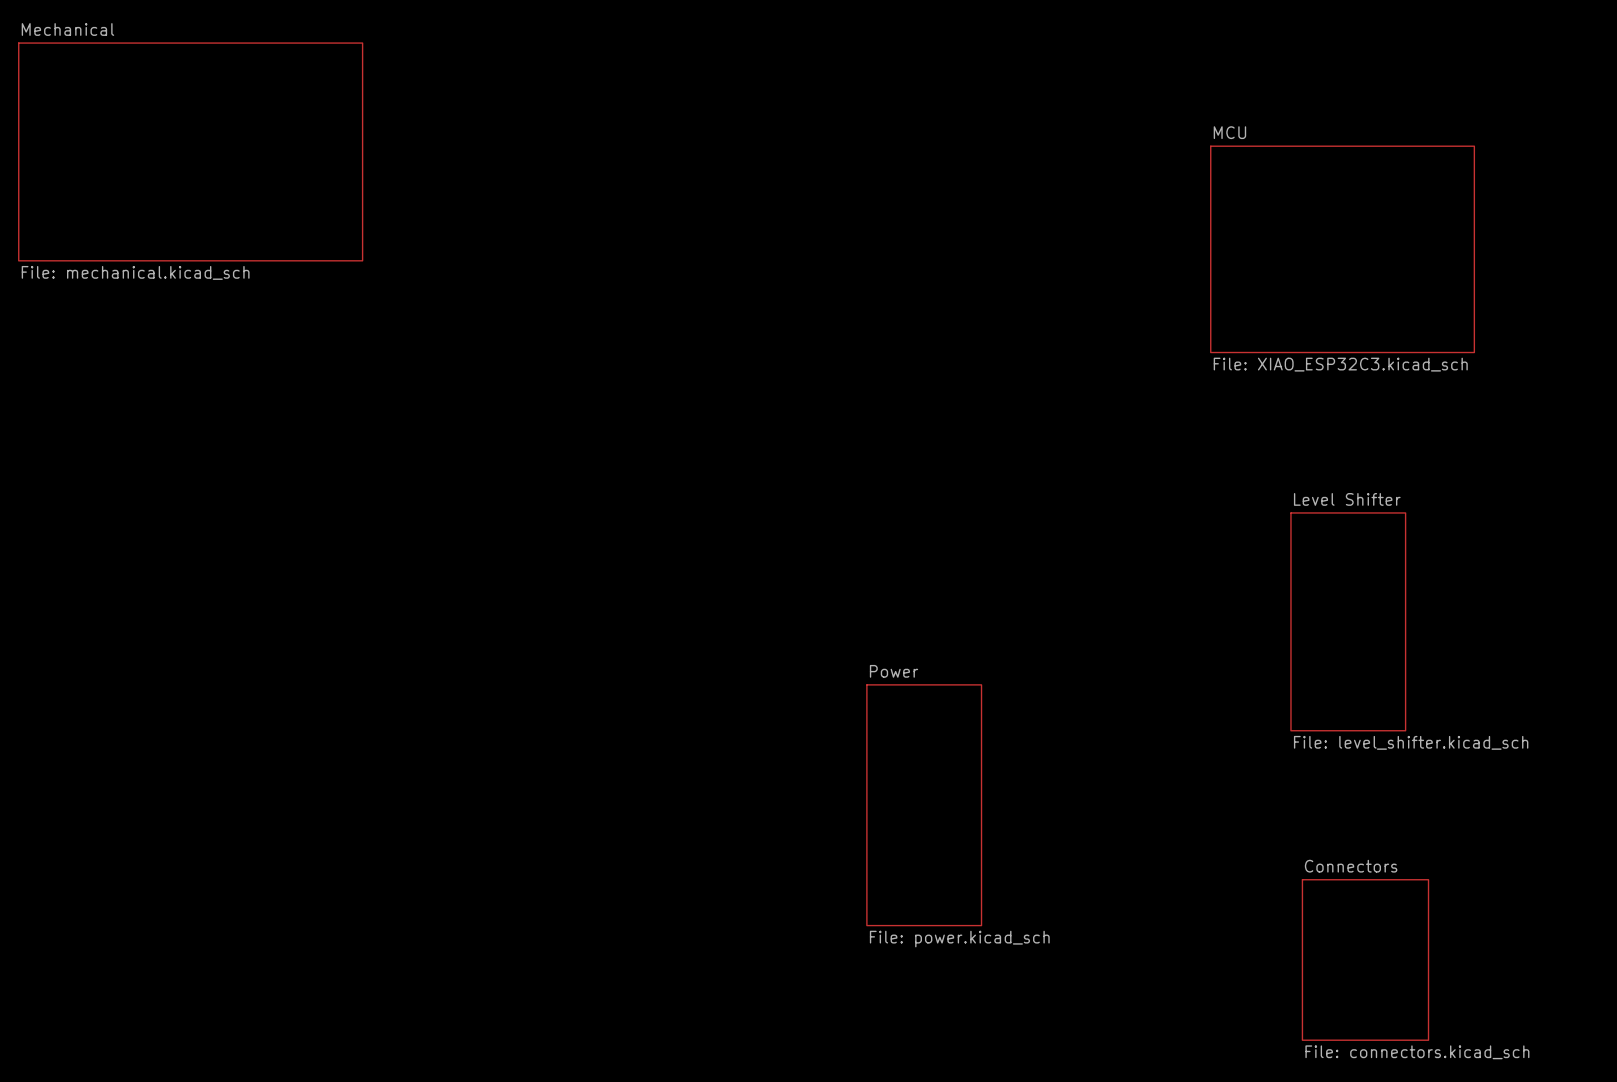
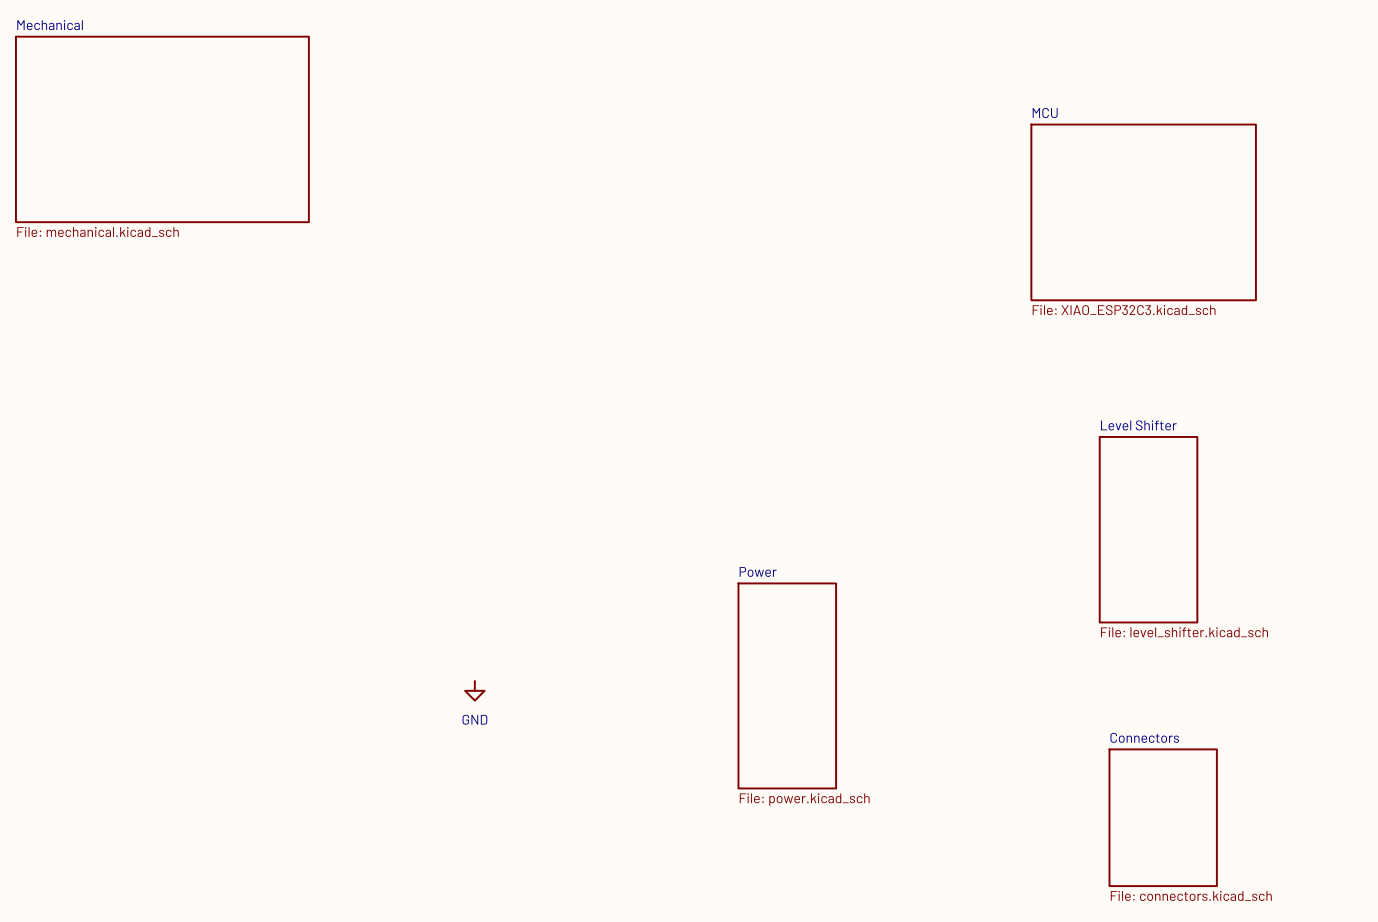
power symbol: none -> GND (474, 690)

